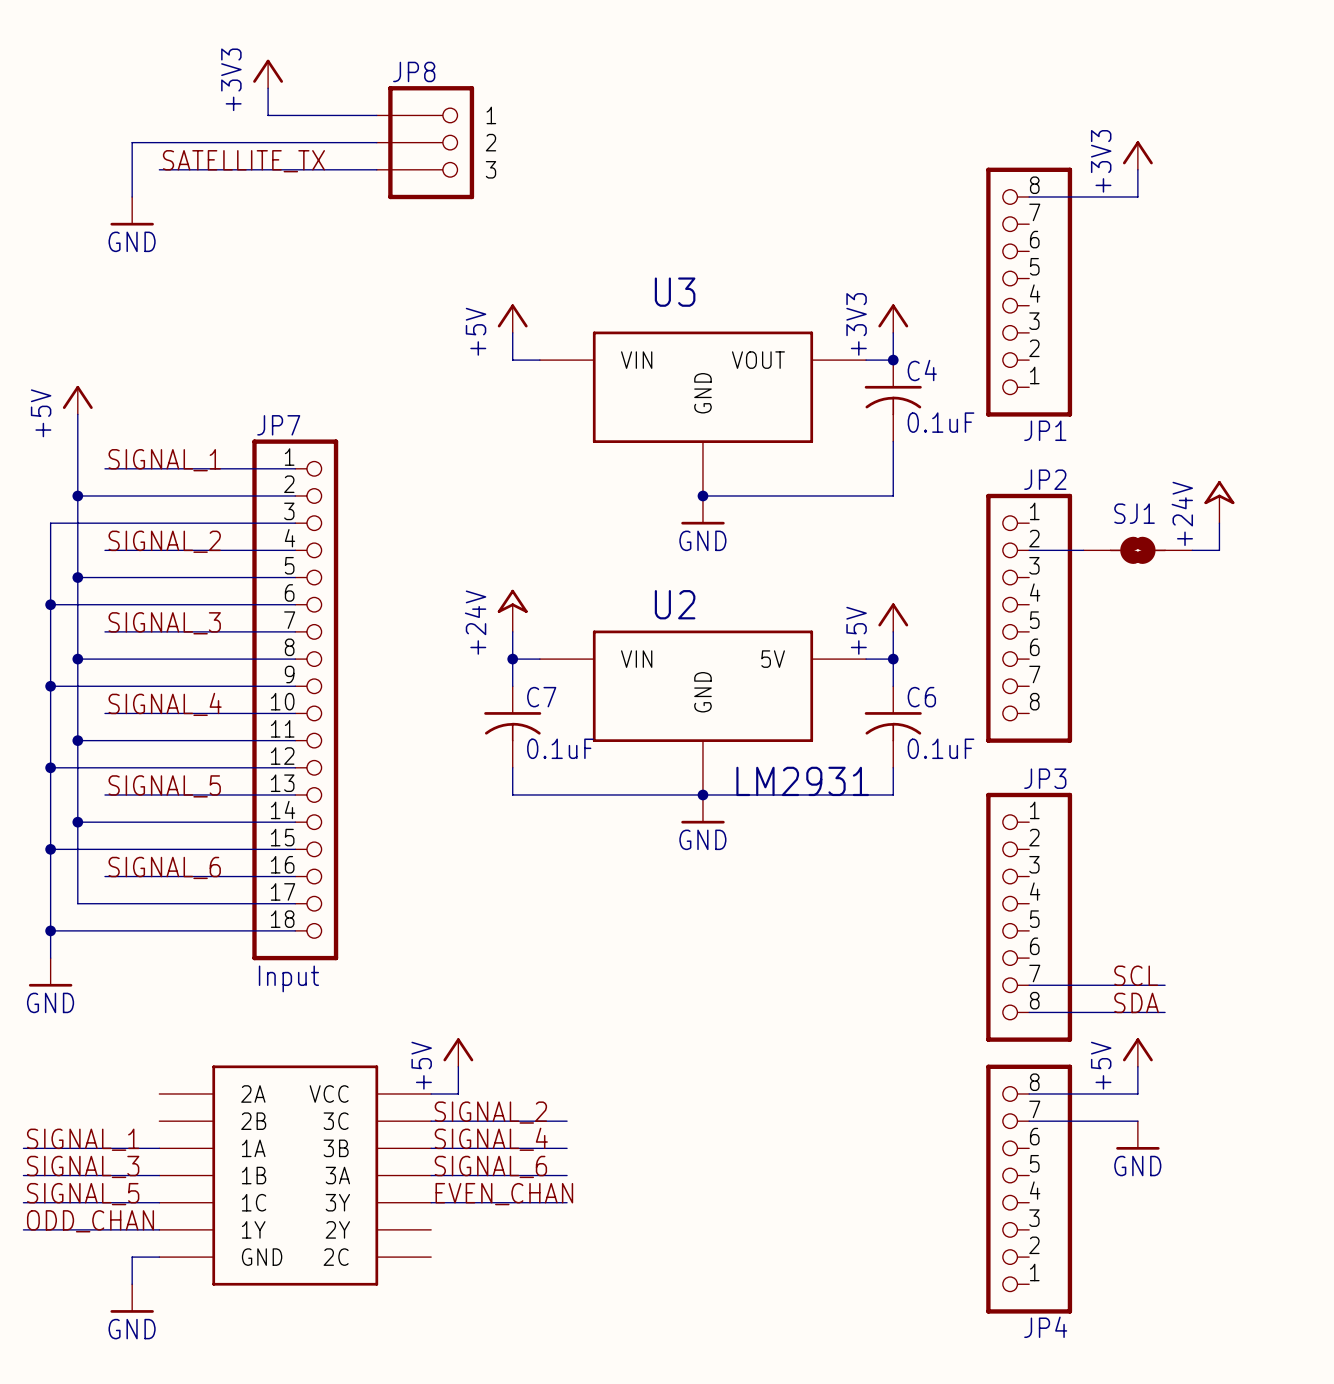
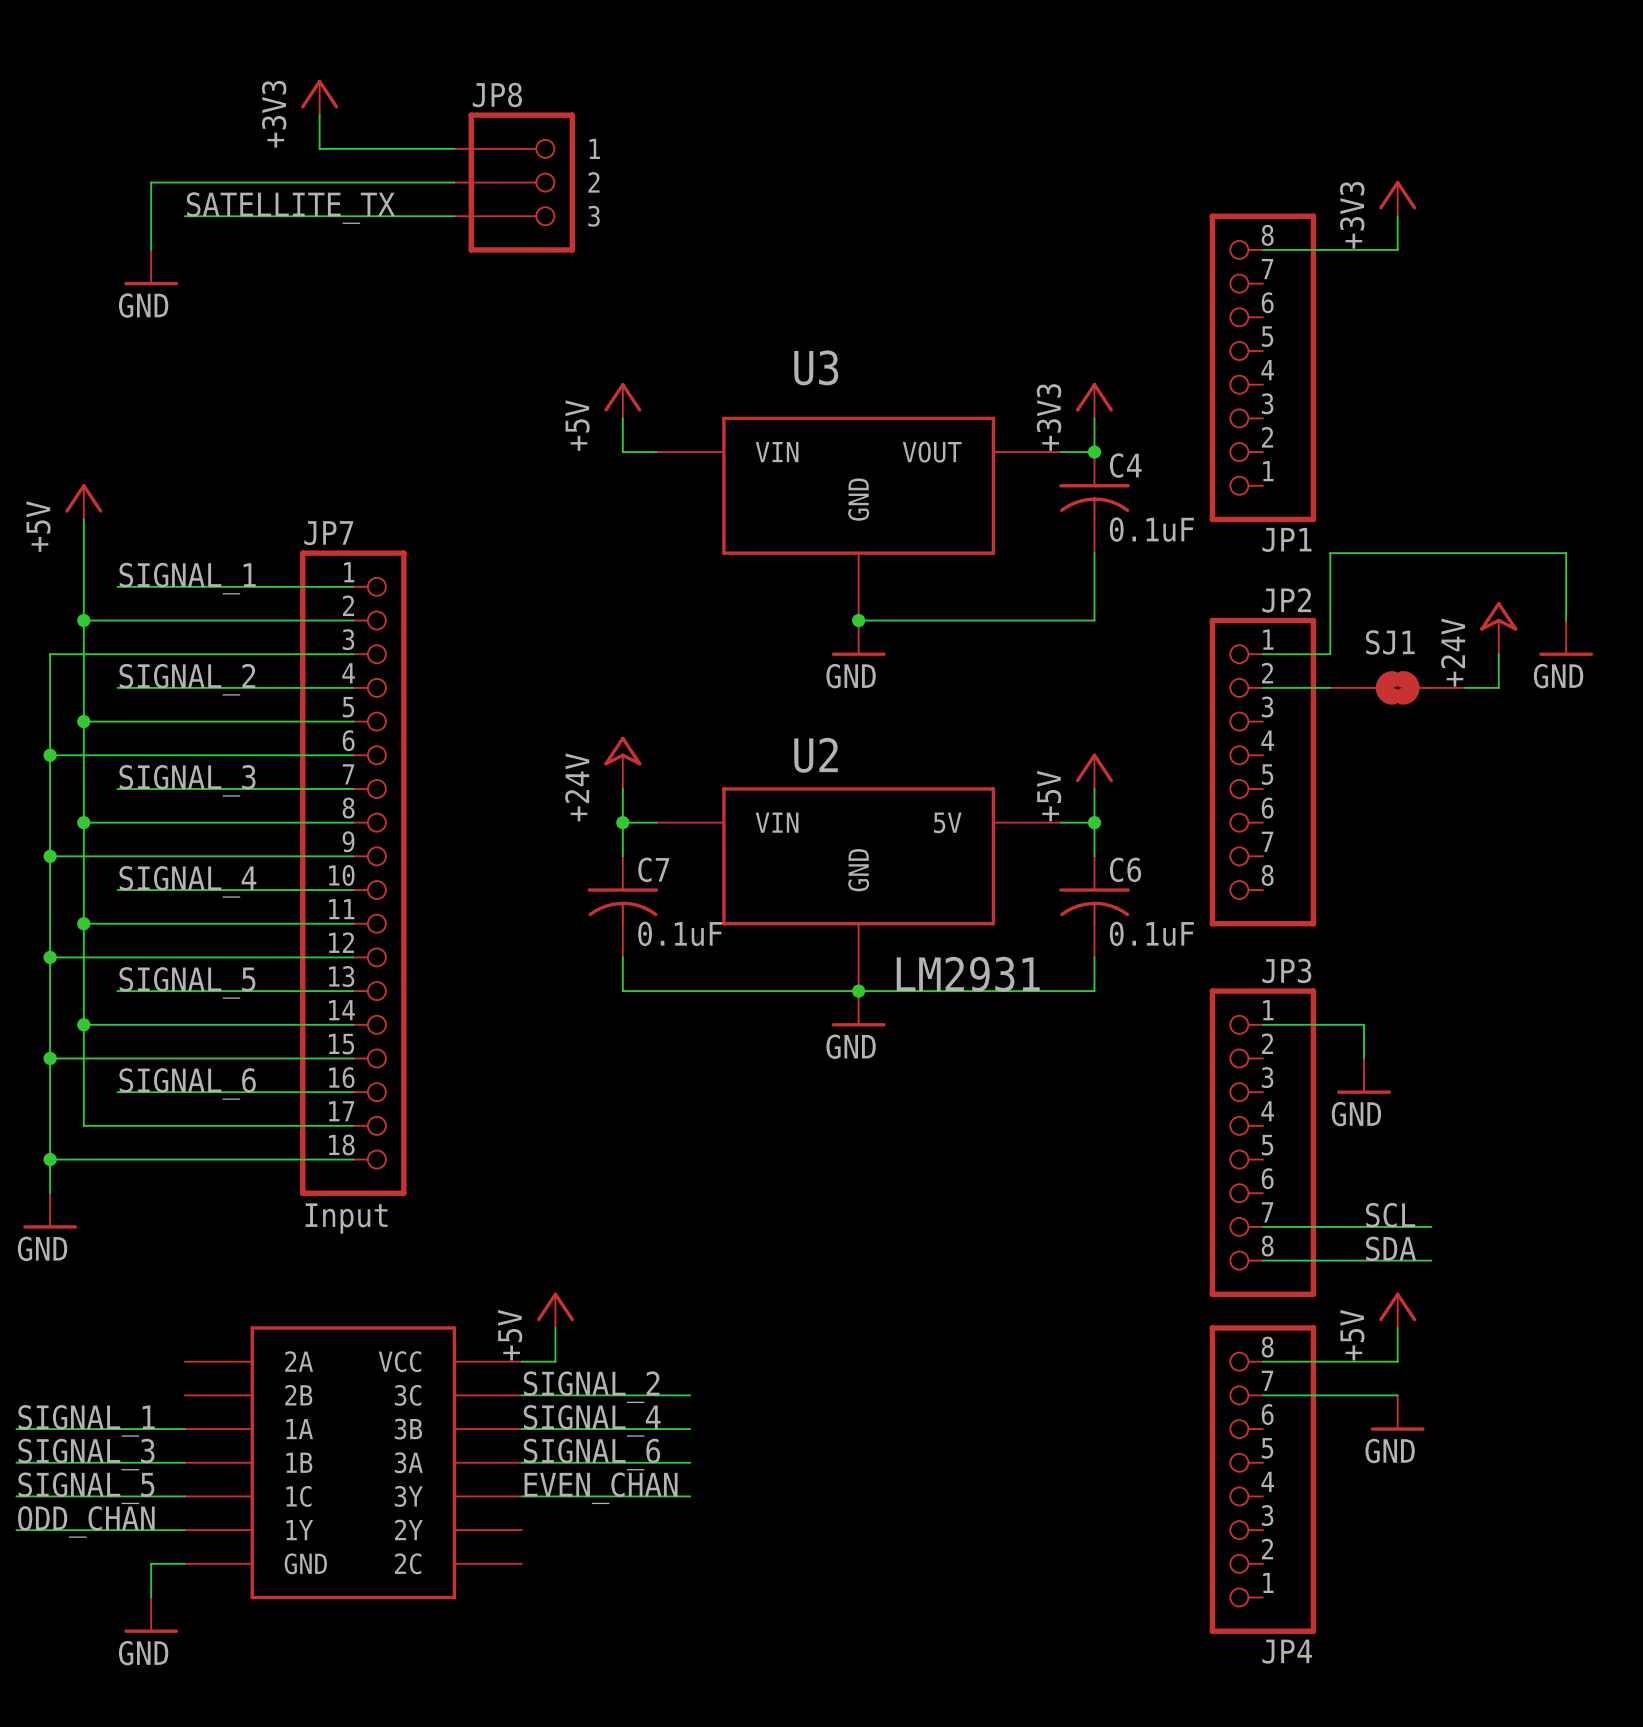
wire: none -> (1566, 620) (1566, 553) (1330, 553) (1330, 654) (1262, 654)
power symbol: none -> GND (1566, 638)
wire: none -> (1262, 1024) (1364, 1024) (1364, 1058)
power symbol: none -> GND (1364, 1076)

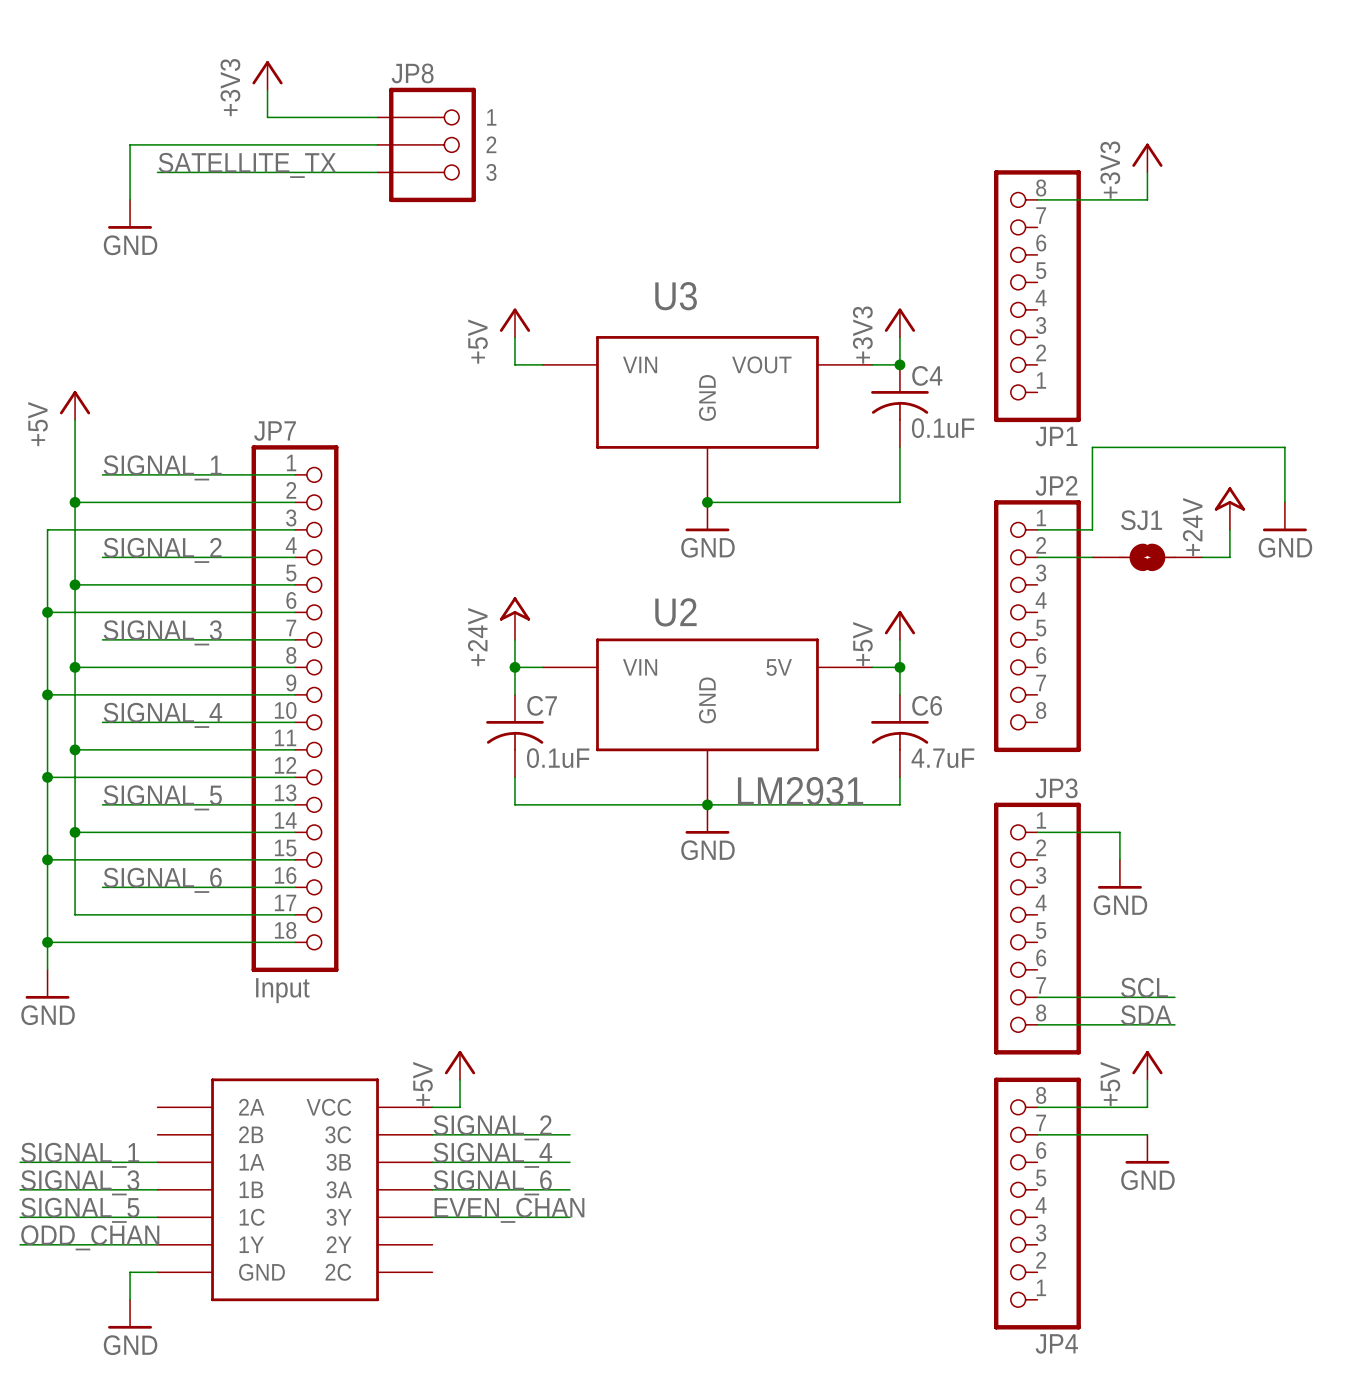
C6 value: 0.1uF (1151, 933) -> 4.7uF (942, 758)

